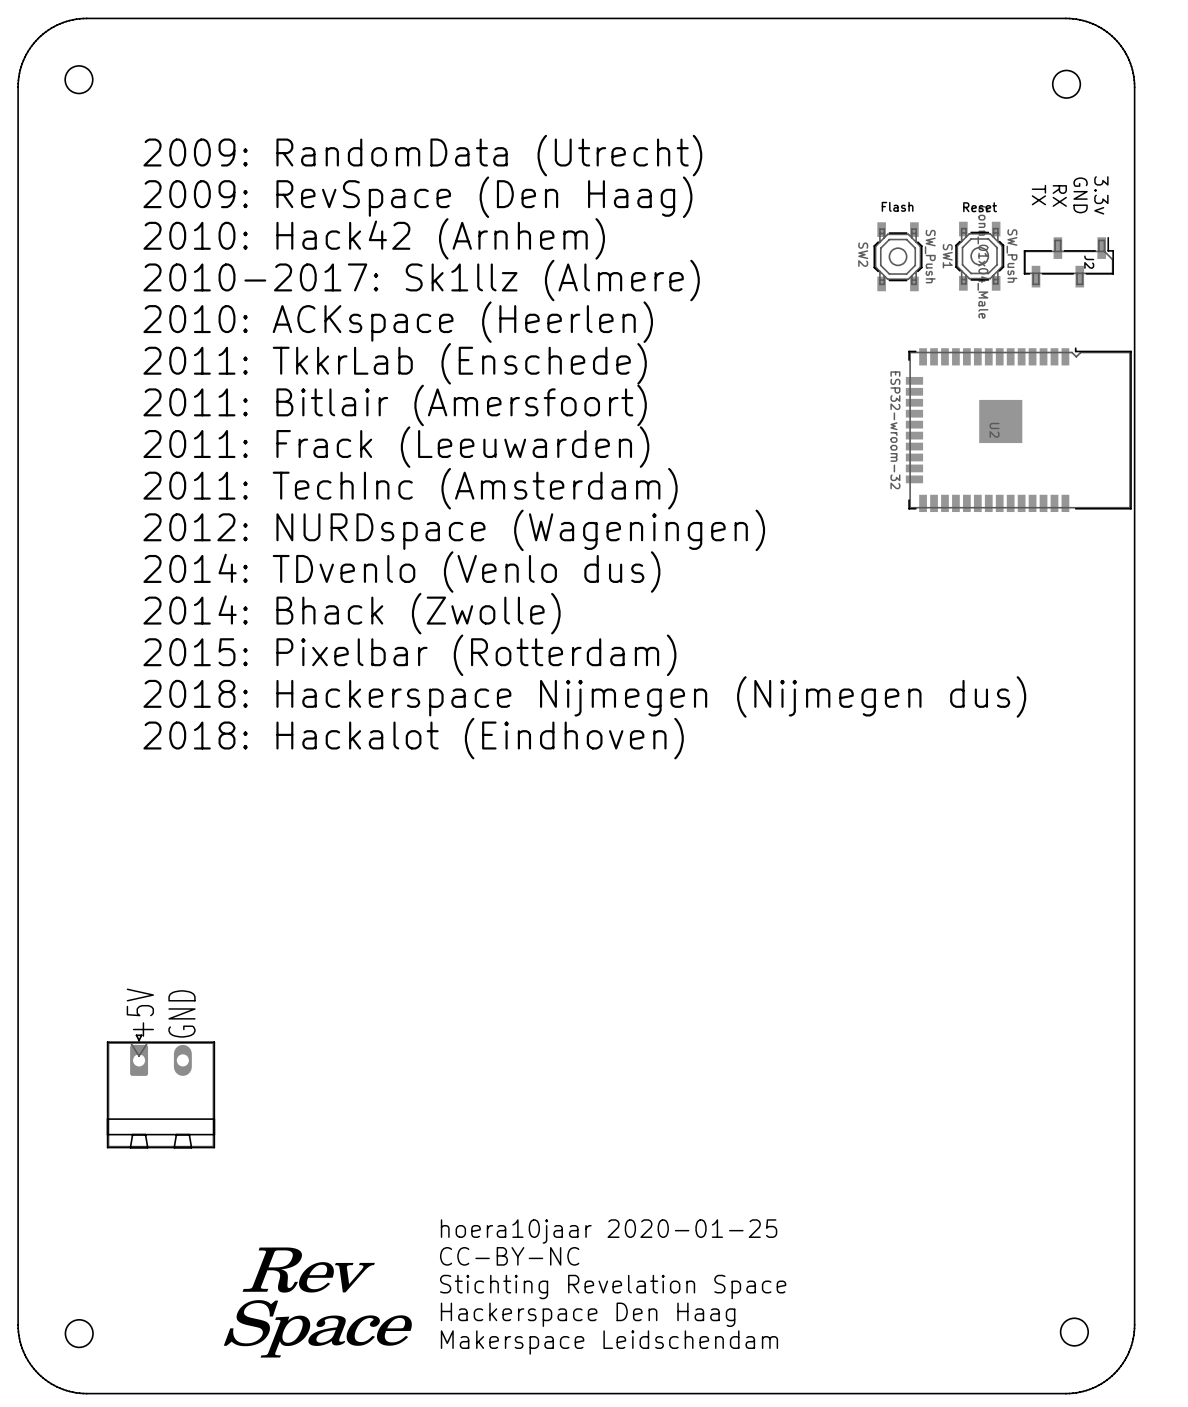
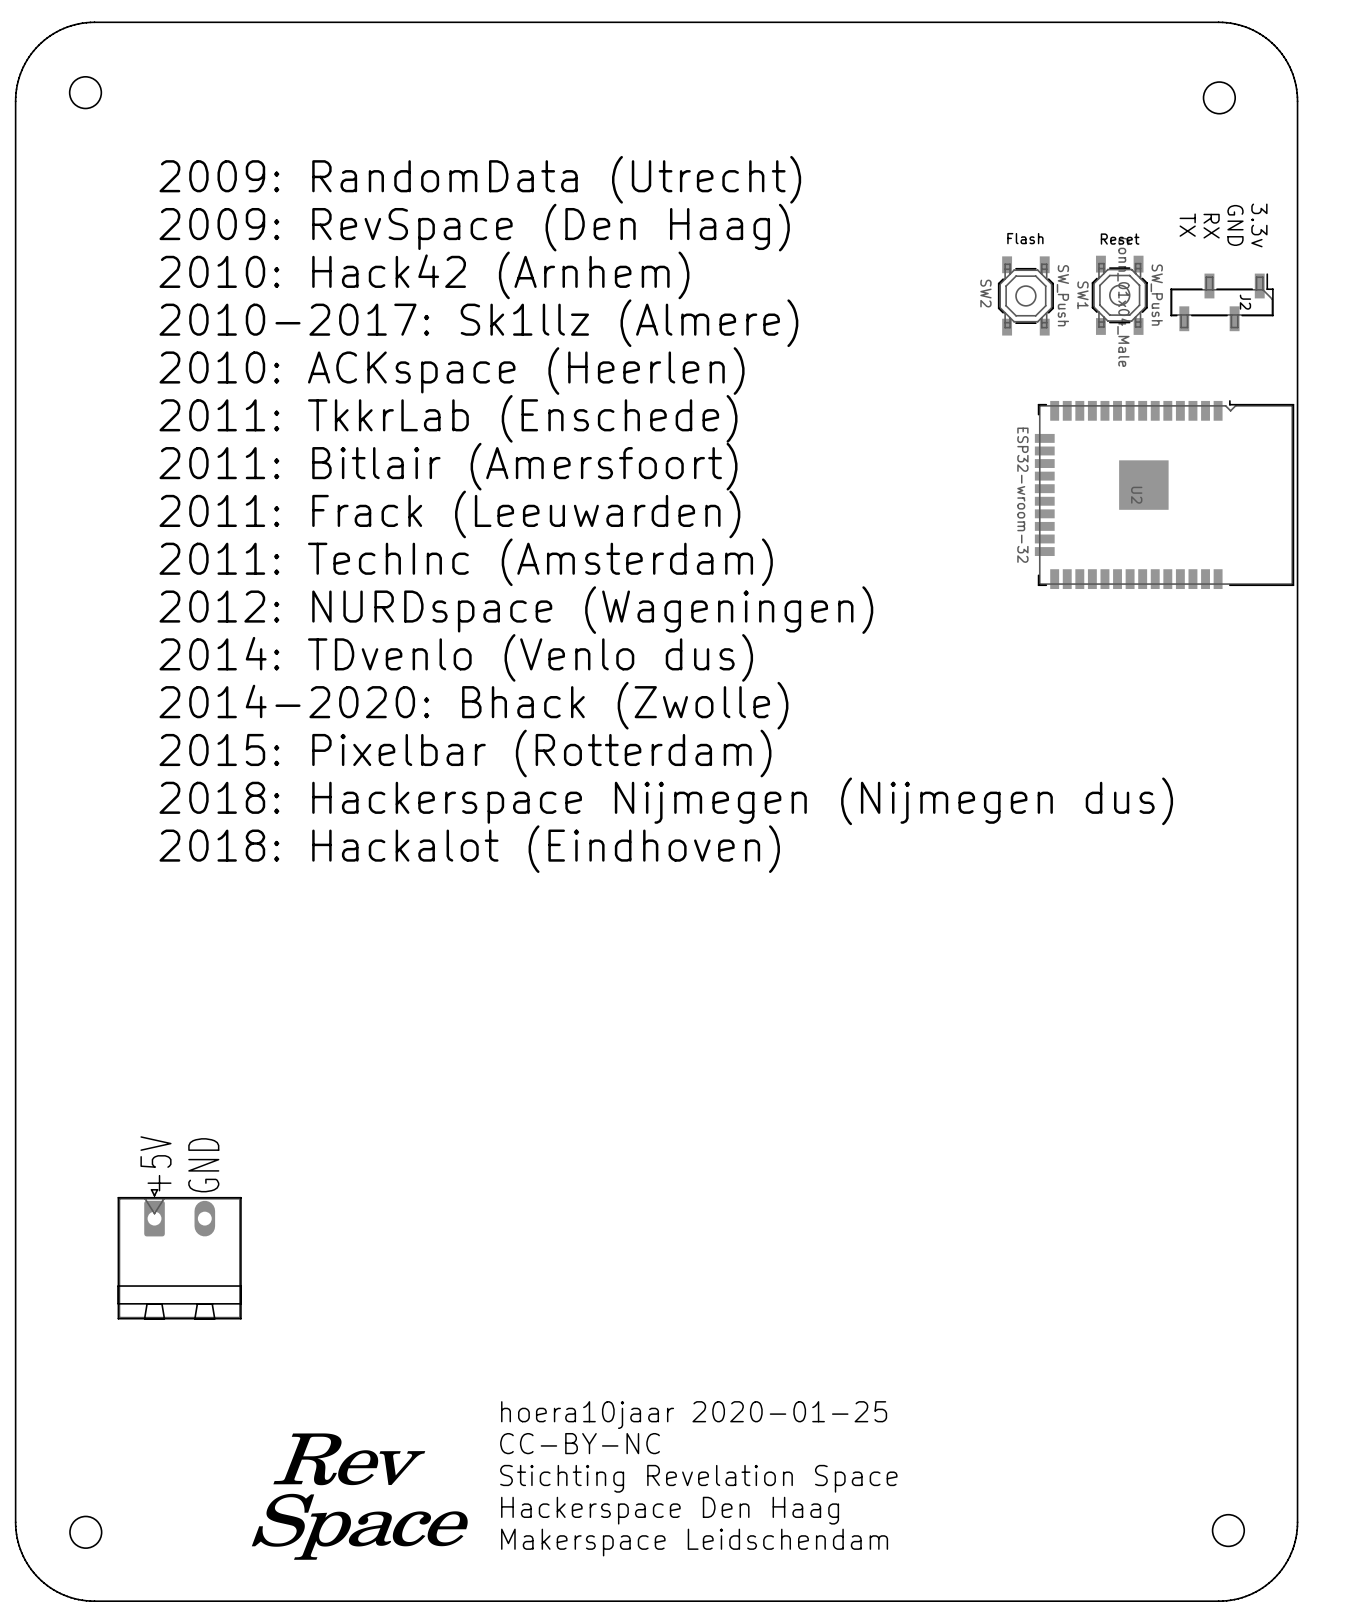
text: 2014: Bhack (Zwolle) (352, 613) -> 2014-2020: Bhack (Zwolle) (473, 705)

